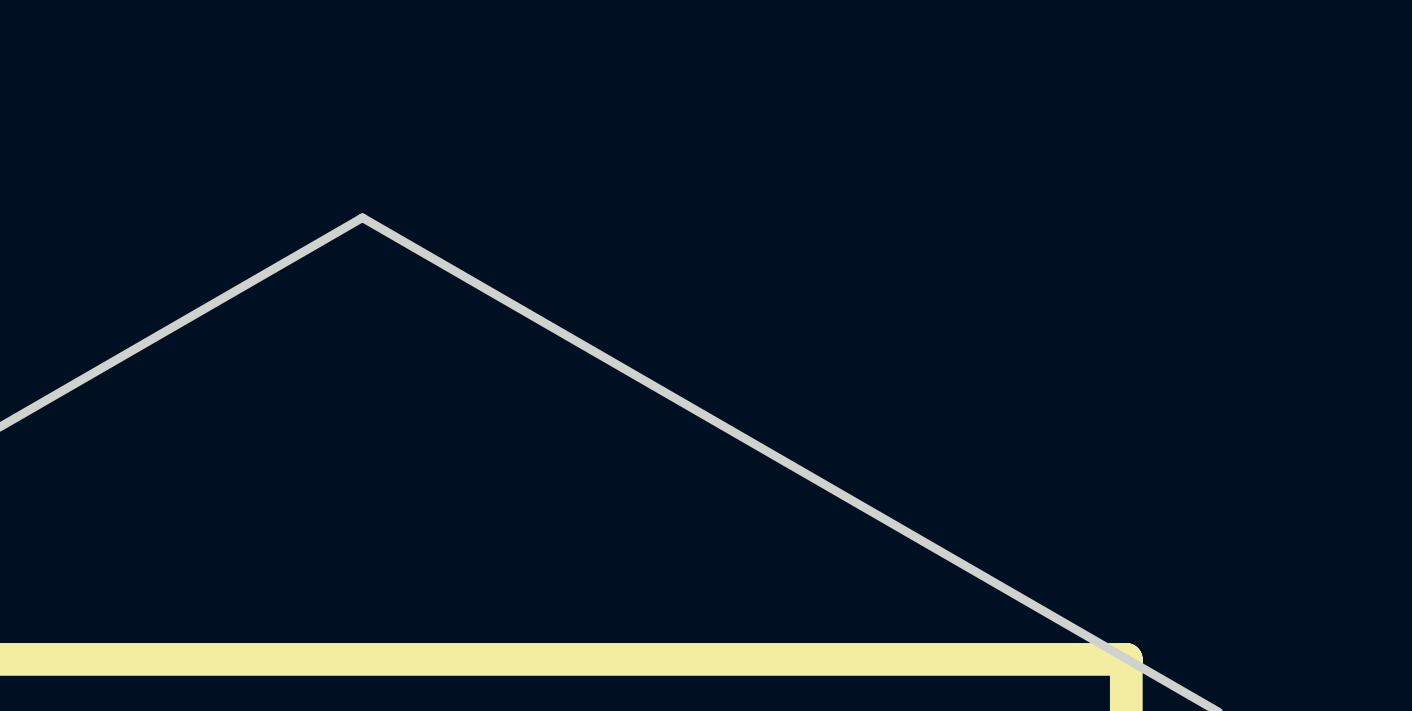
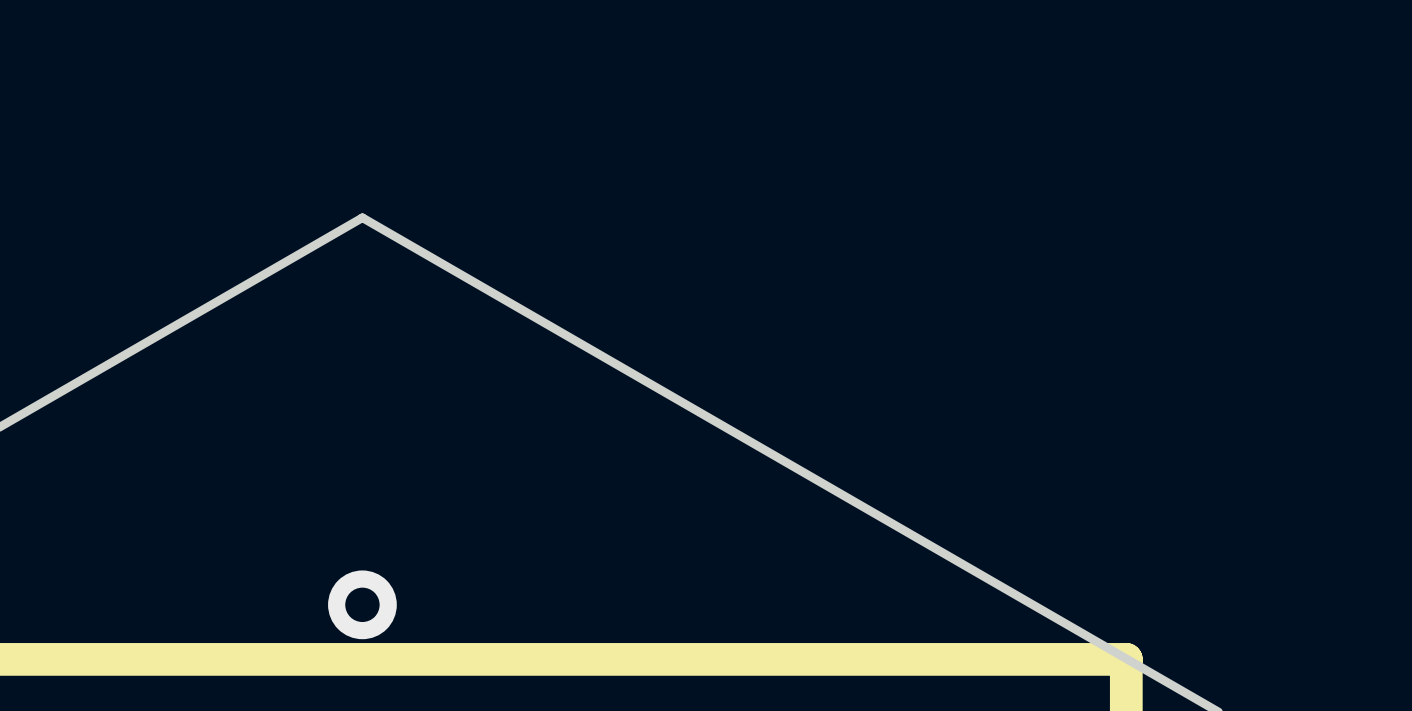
via: none -> (362, 604)

